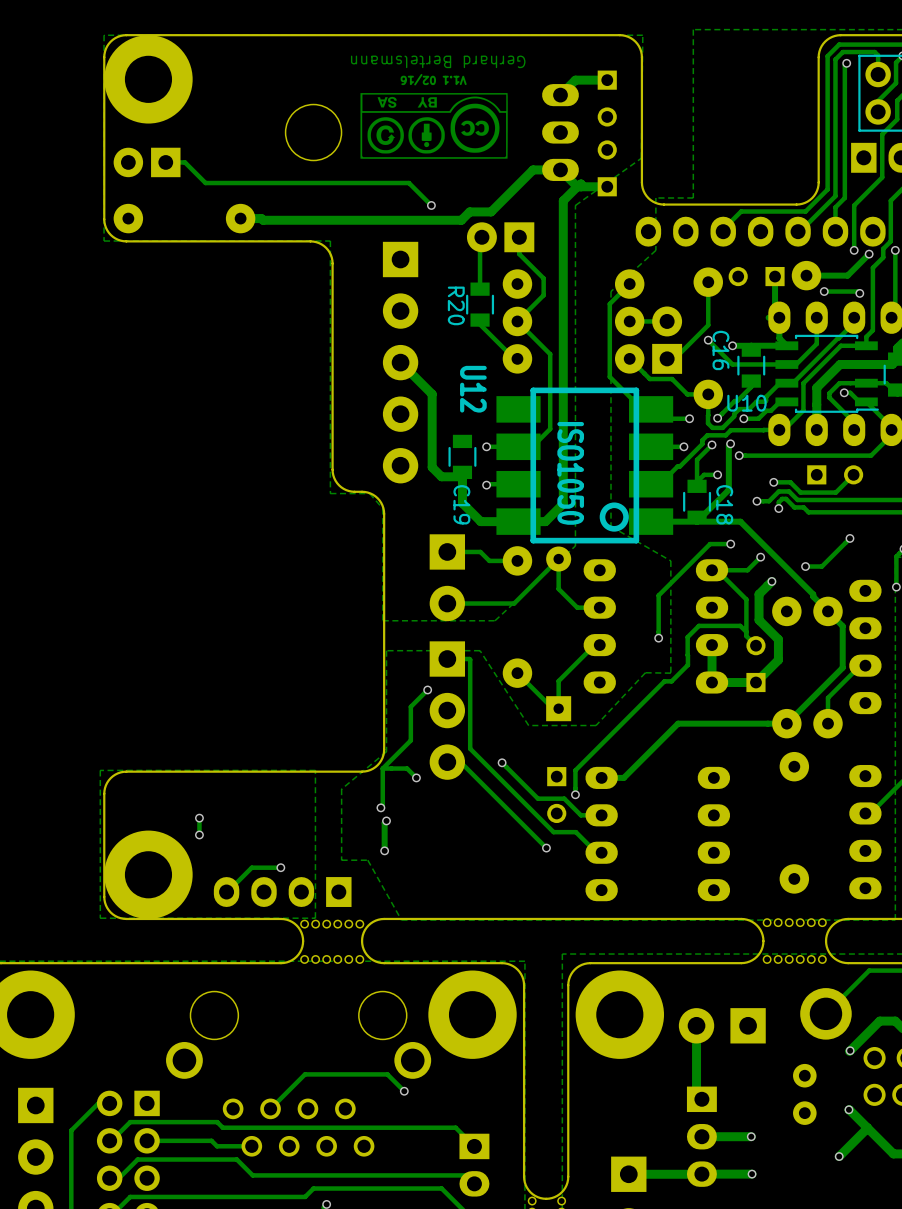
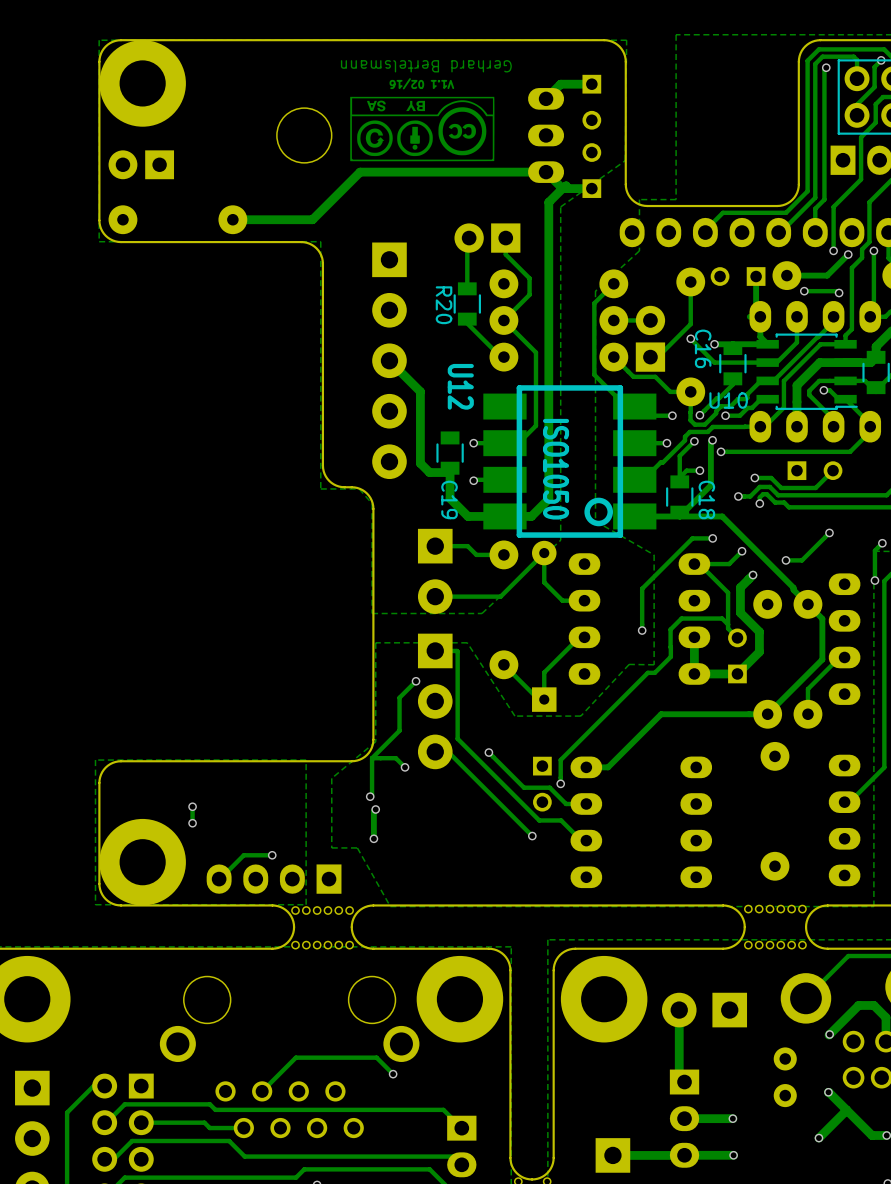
track: (165, 162) (184, 162) (205, 183) (408, 183) (431, 205) -> none
track: (533, 169) (491, 211) (469, 211) (461, 220) (263, 220) (261, 218) -> (519, 172) (360, 172) (312, 219) (253, 219)
via: (431, 205) -> none

